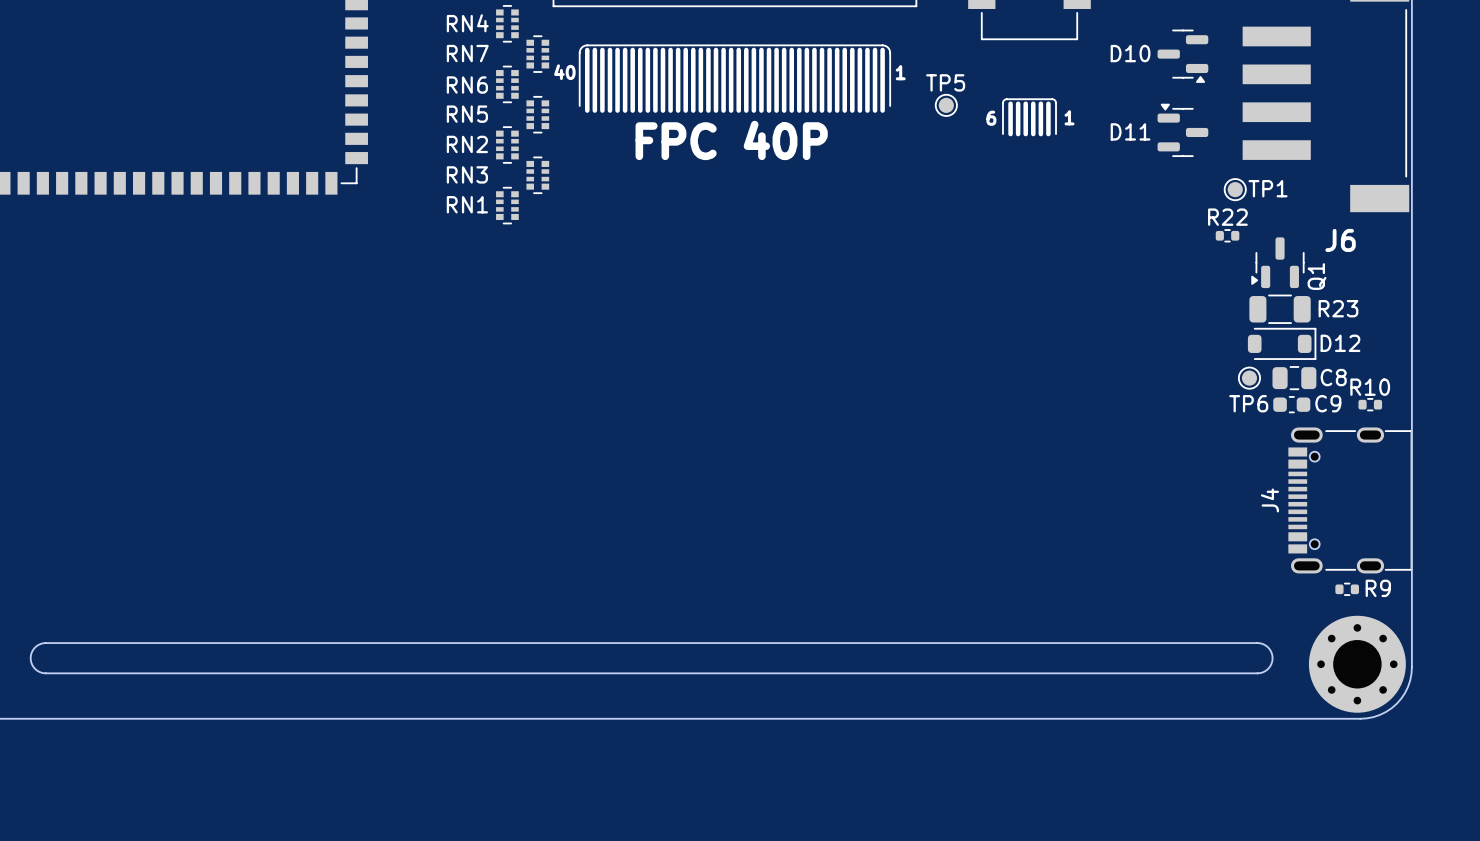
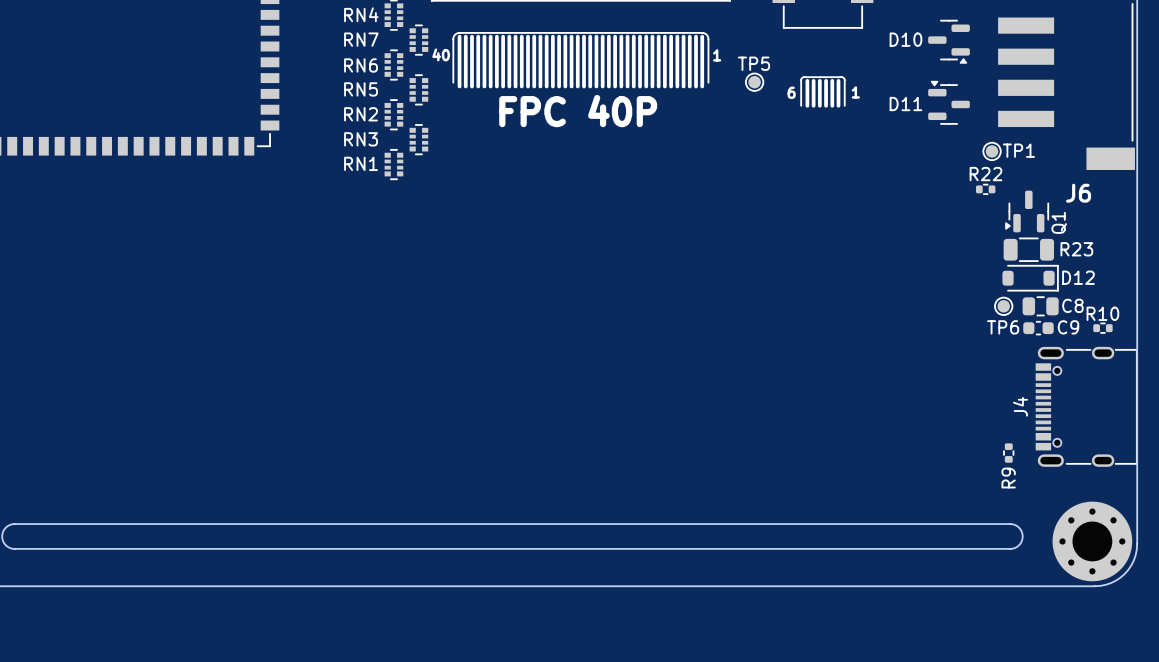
R9 rotation: 0° (1347, 589) -> 90° clockwise (1008, 453)
R9 position: (1347, 589) -> (1008, 453)

